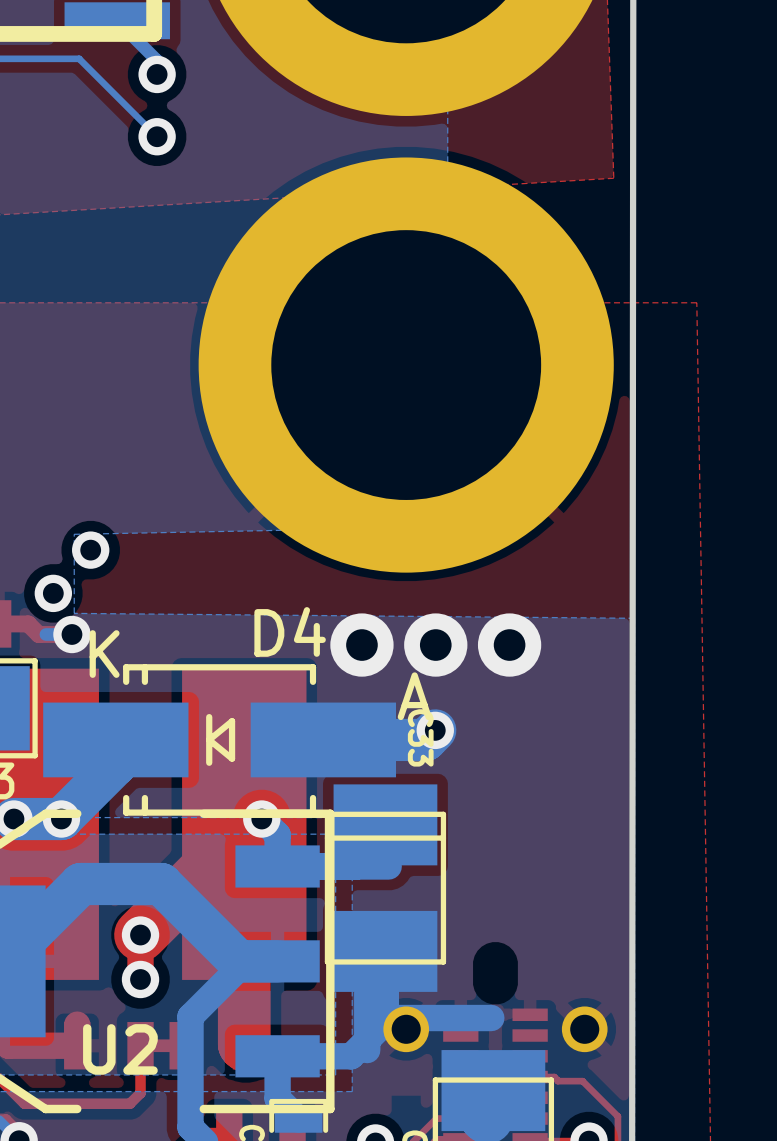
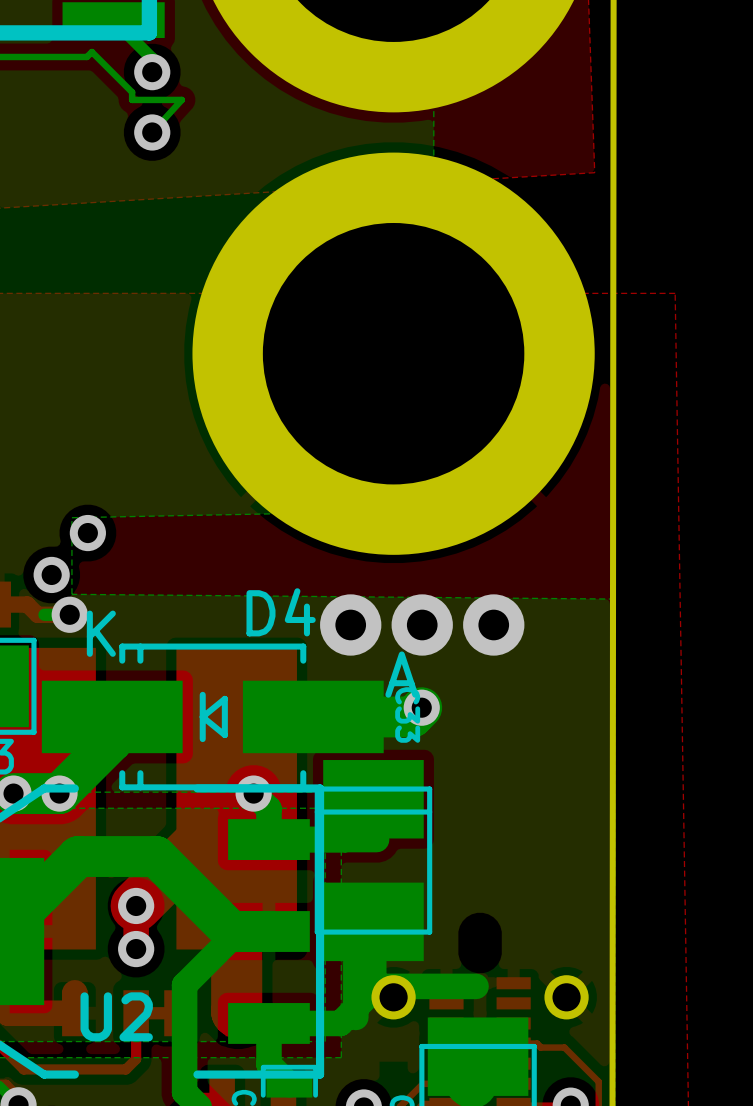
bottom track: (79, 58) (157, 136) -> (76, 56) (86, 56) (91, 52) (132, 92) (132, 99) (181, 99) (152, 132)

